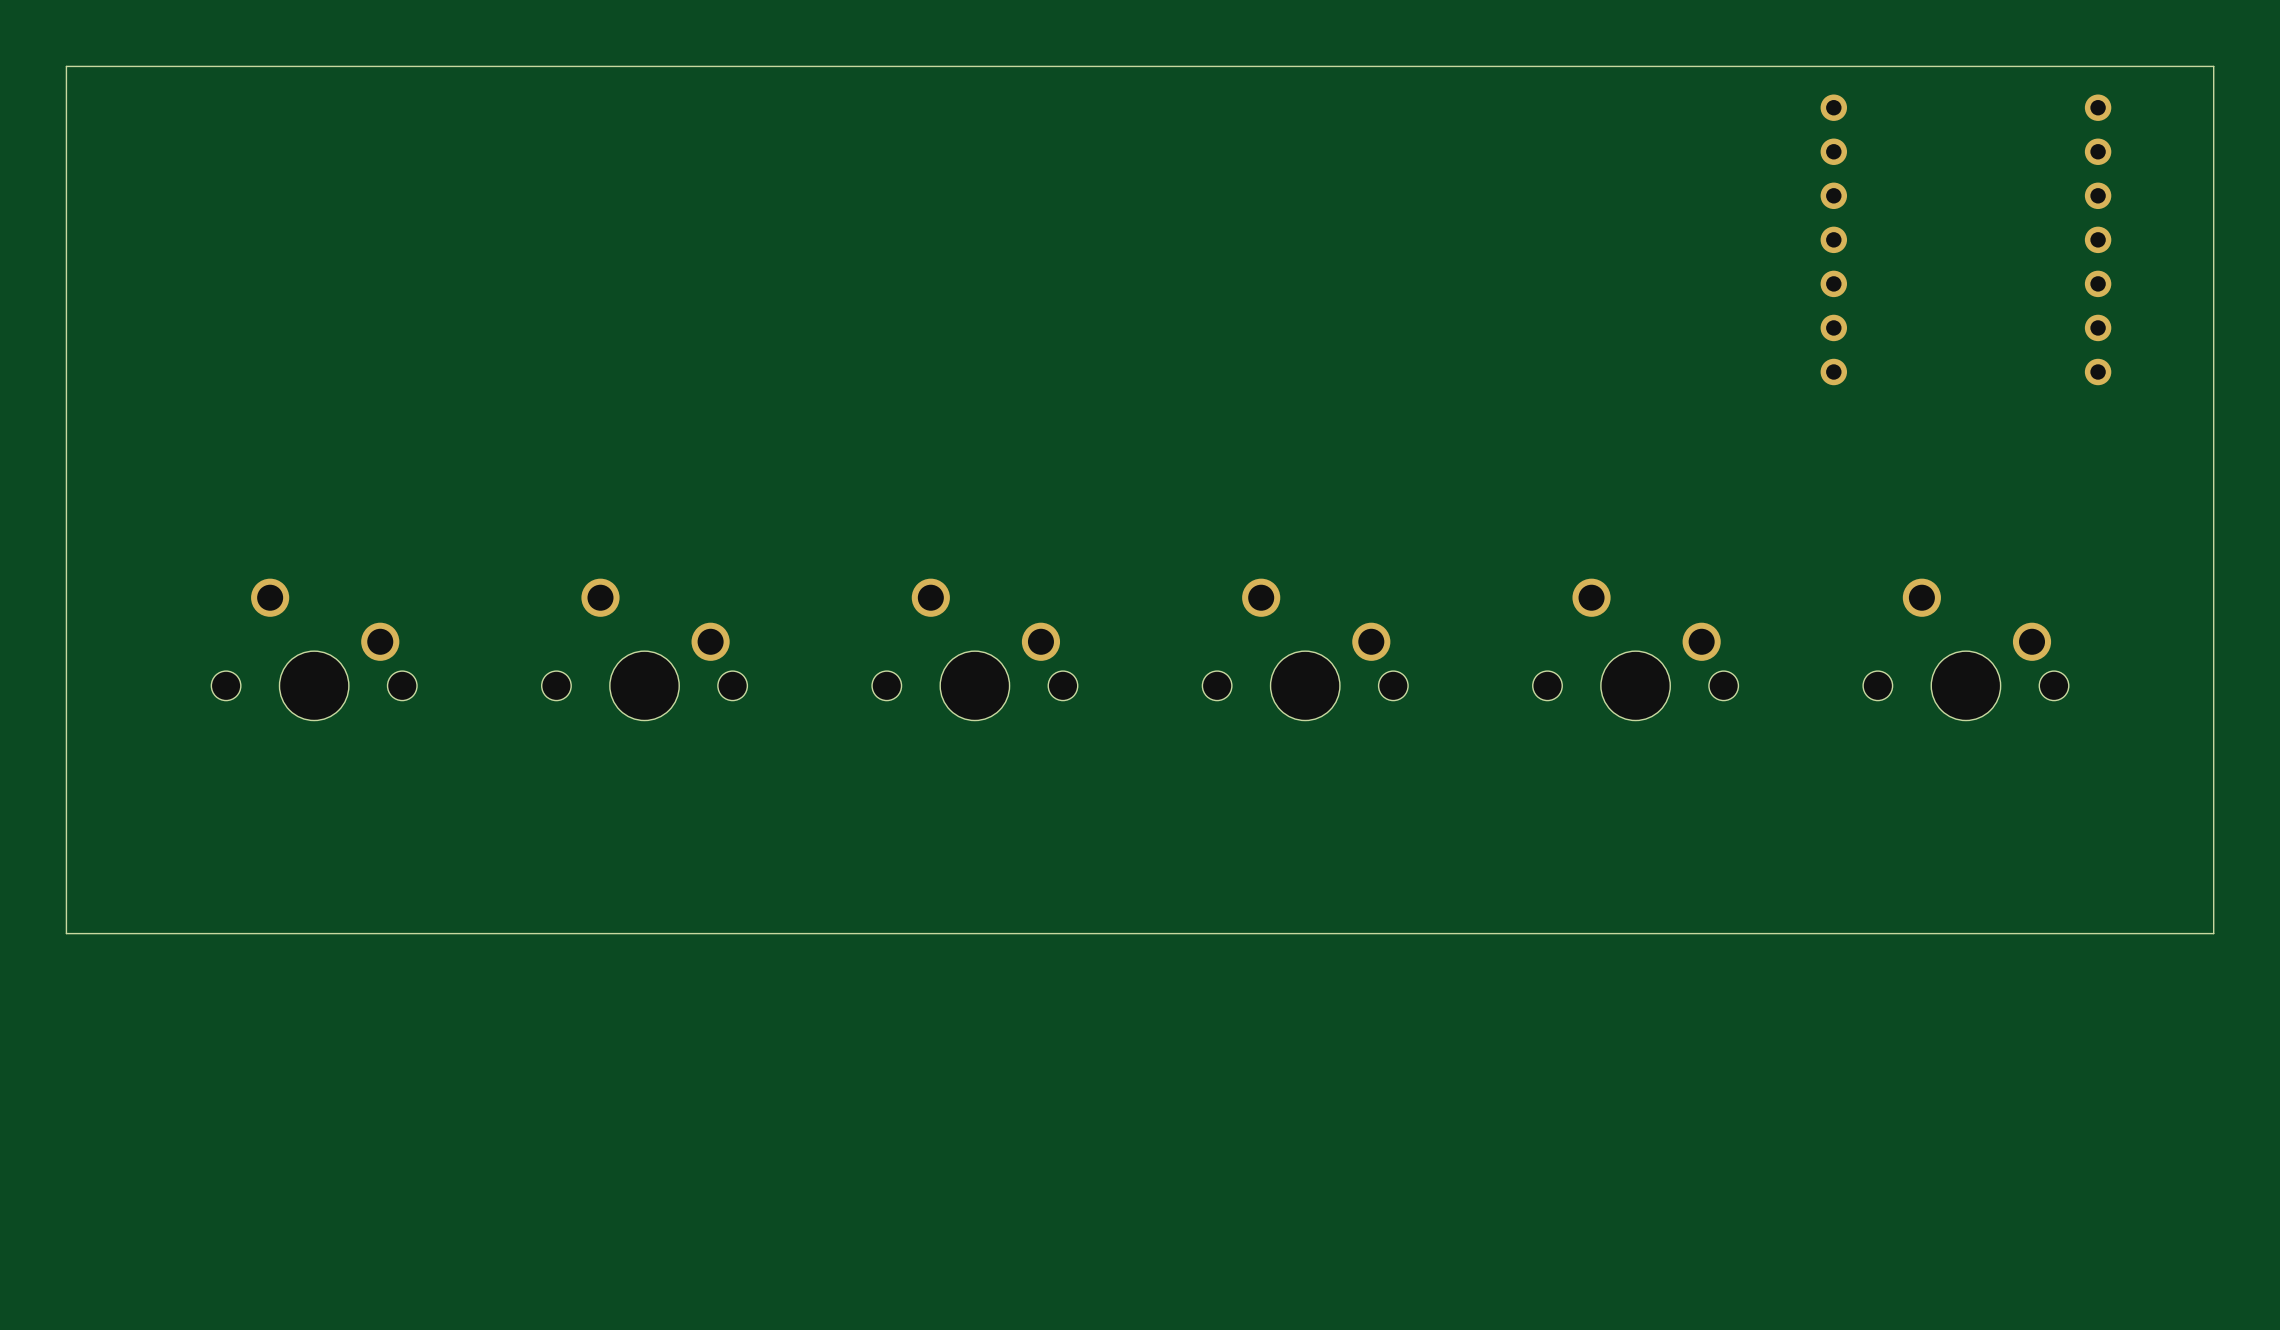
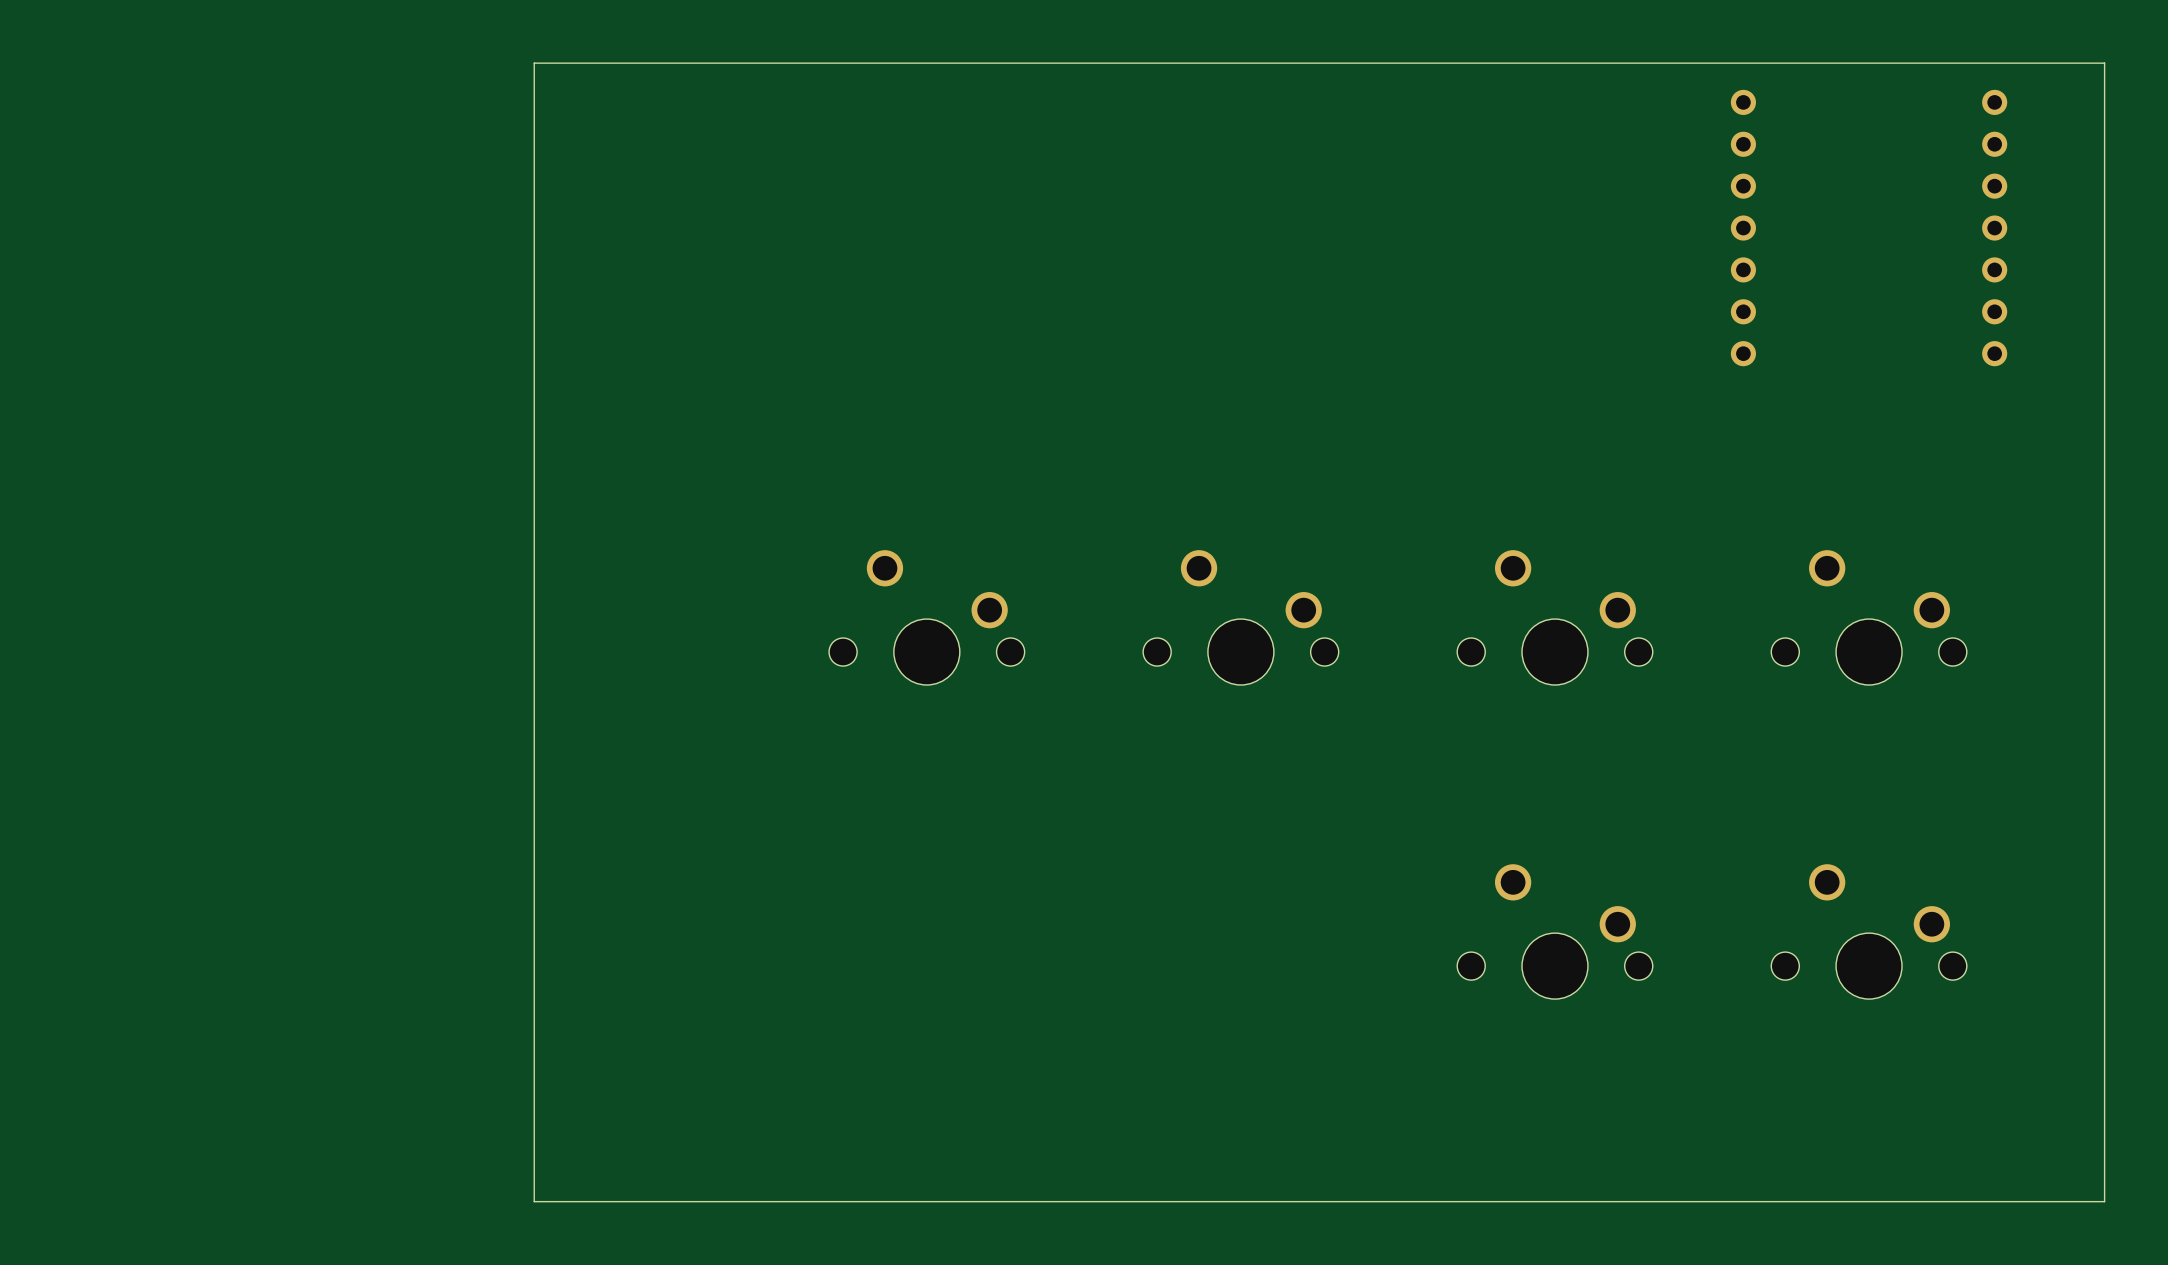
board edge: (561, 66) (66, 66) (66, 933) (2213, 933) -> (534, 63) (534, 1201) (2104, 1201) (2104, 887)
part: (314, 649) -> none
part: (644, 649) -> none
part: none -> (1554, 931)
part: none -> (1869, 931)

